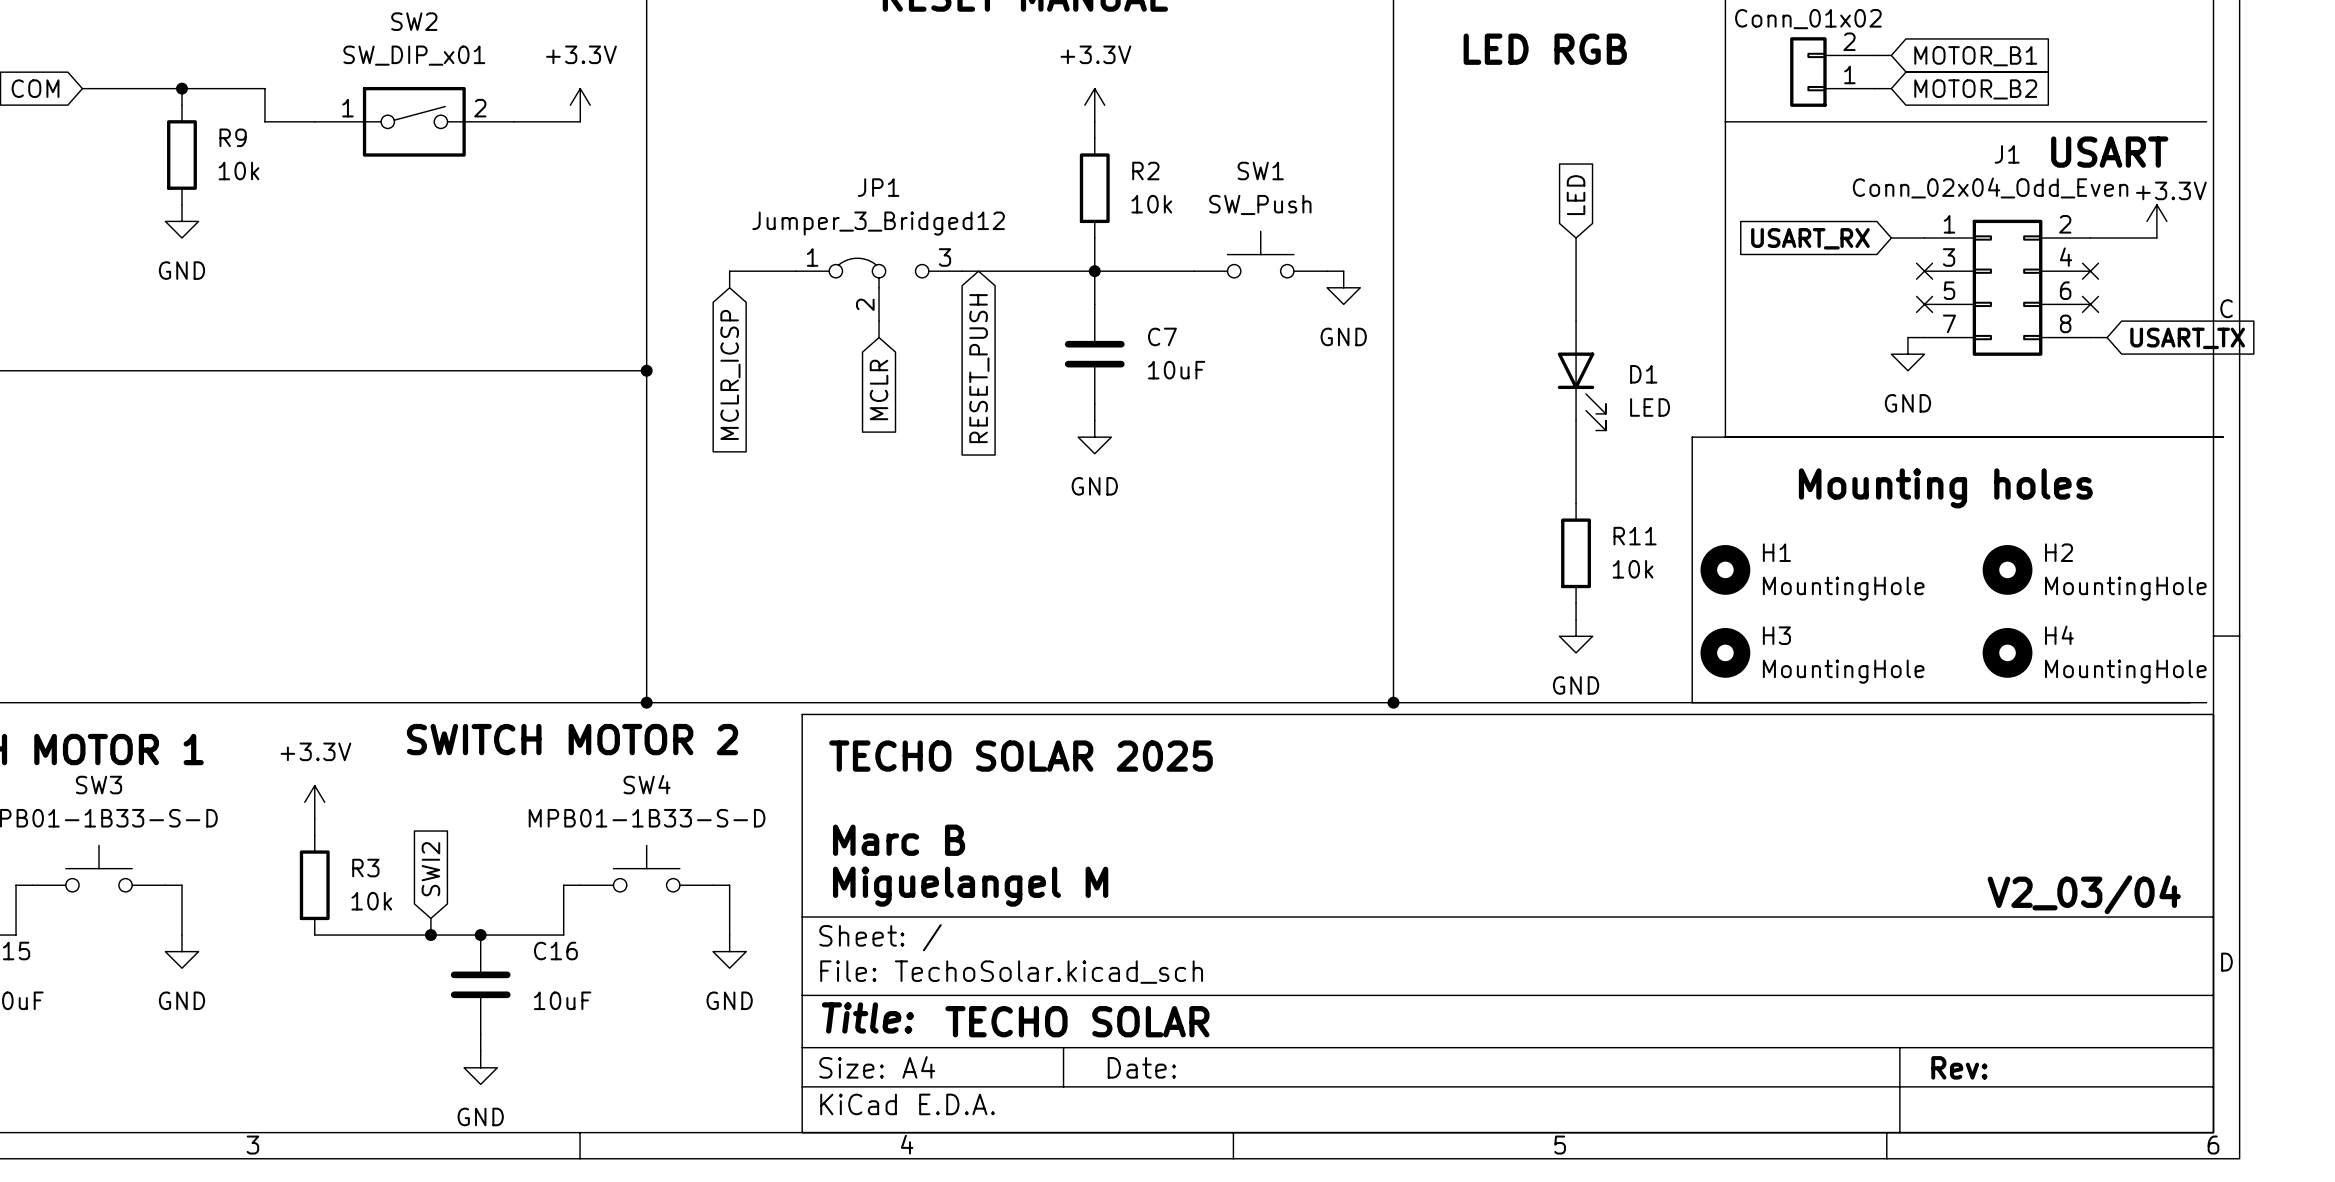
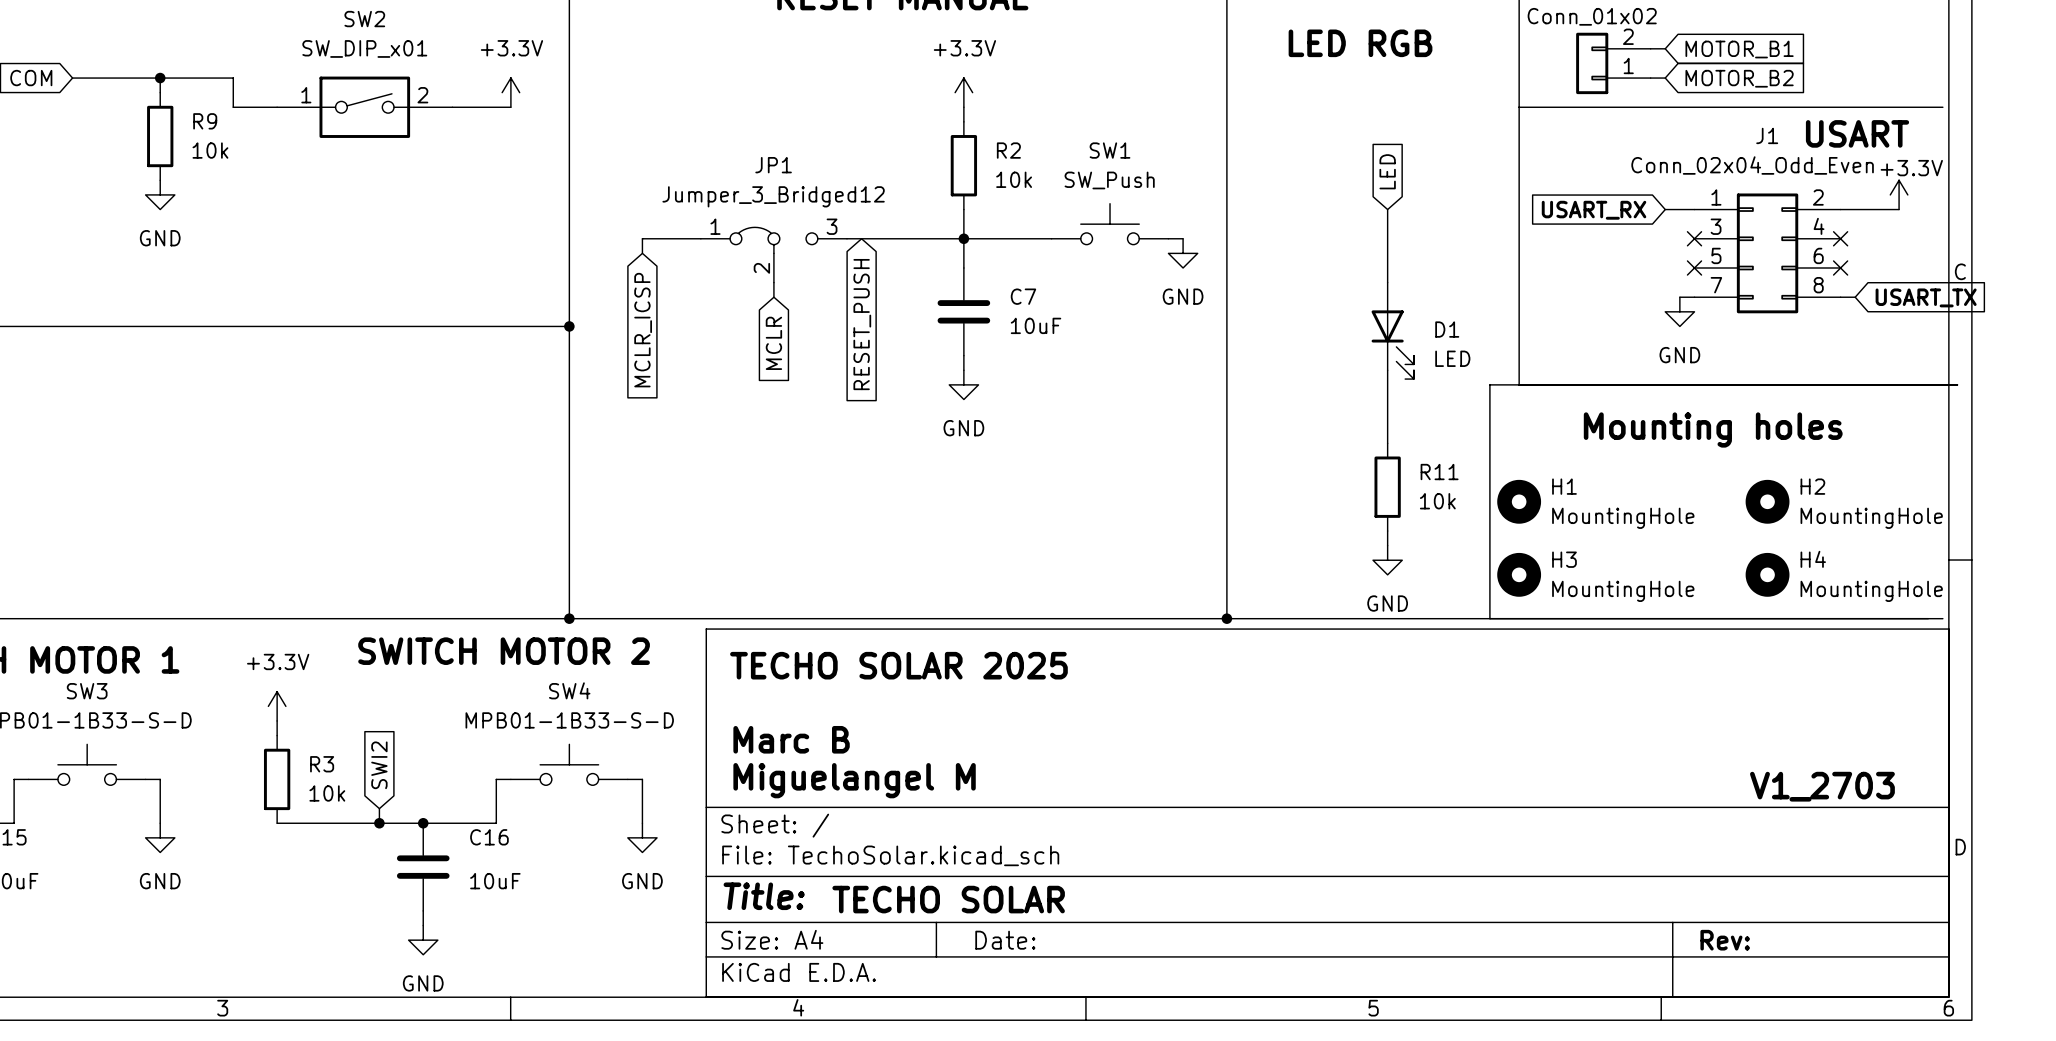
text: V2_03/04 (2084, 894) -> V1_2703 (1822, 786)

